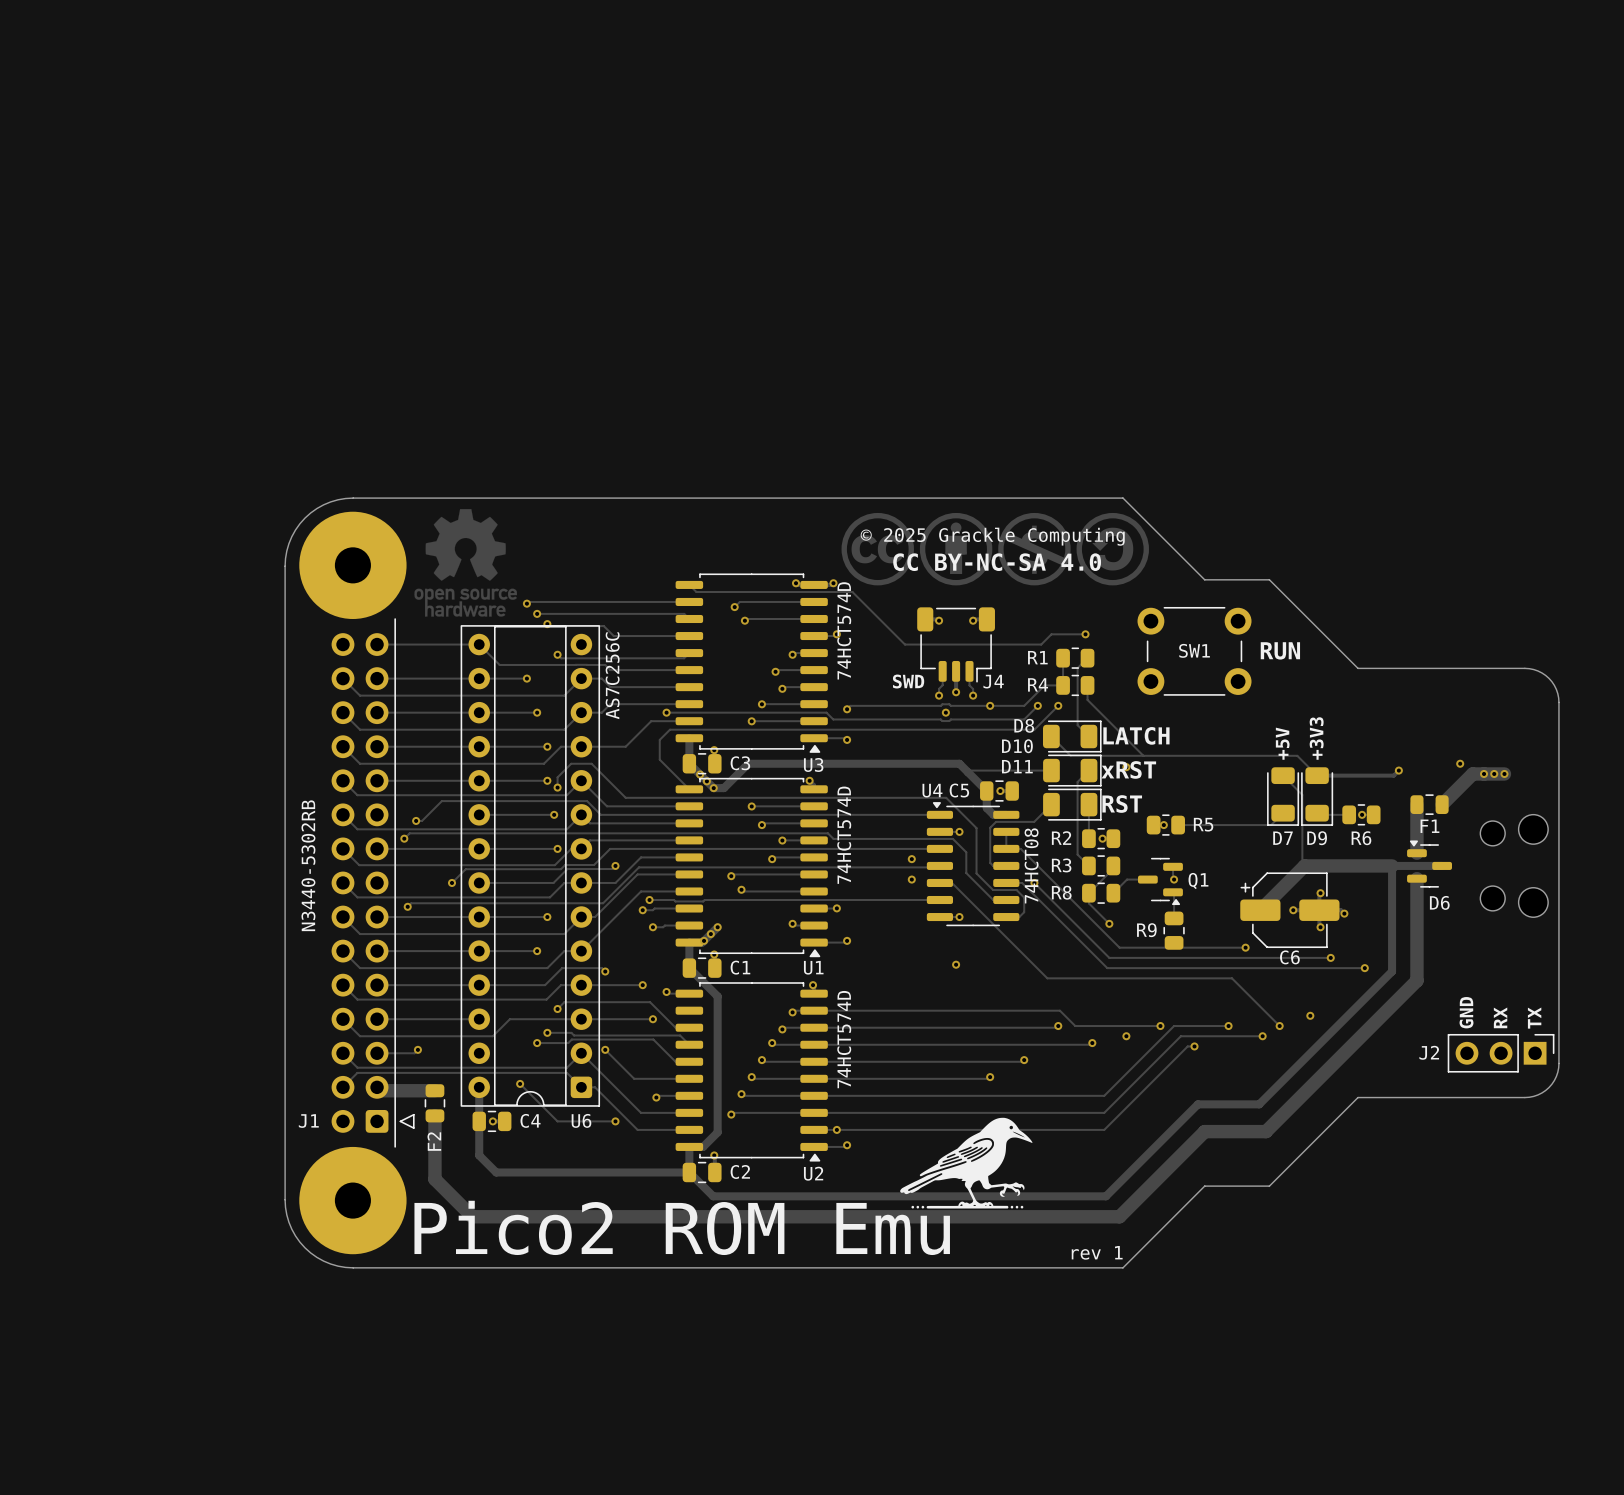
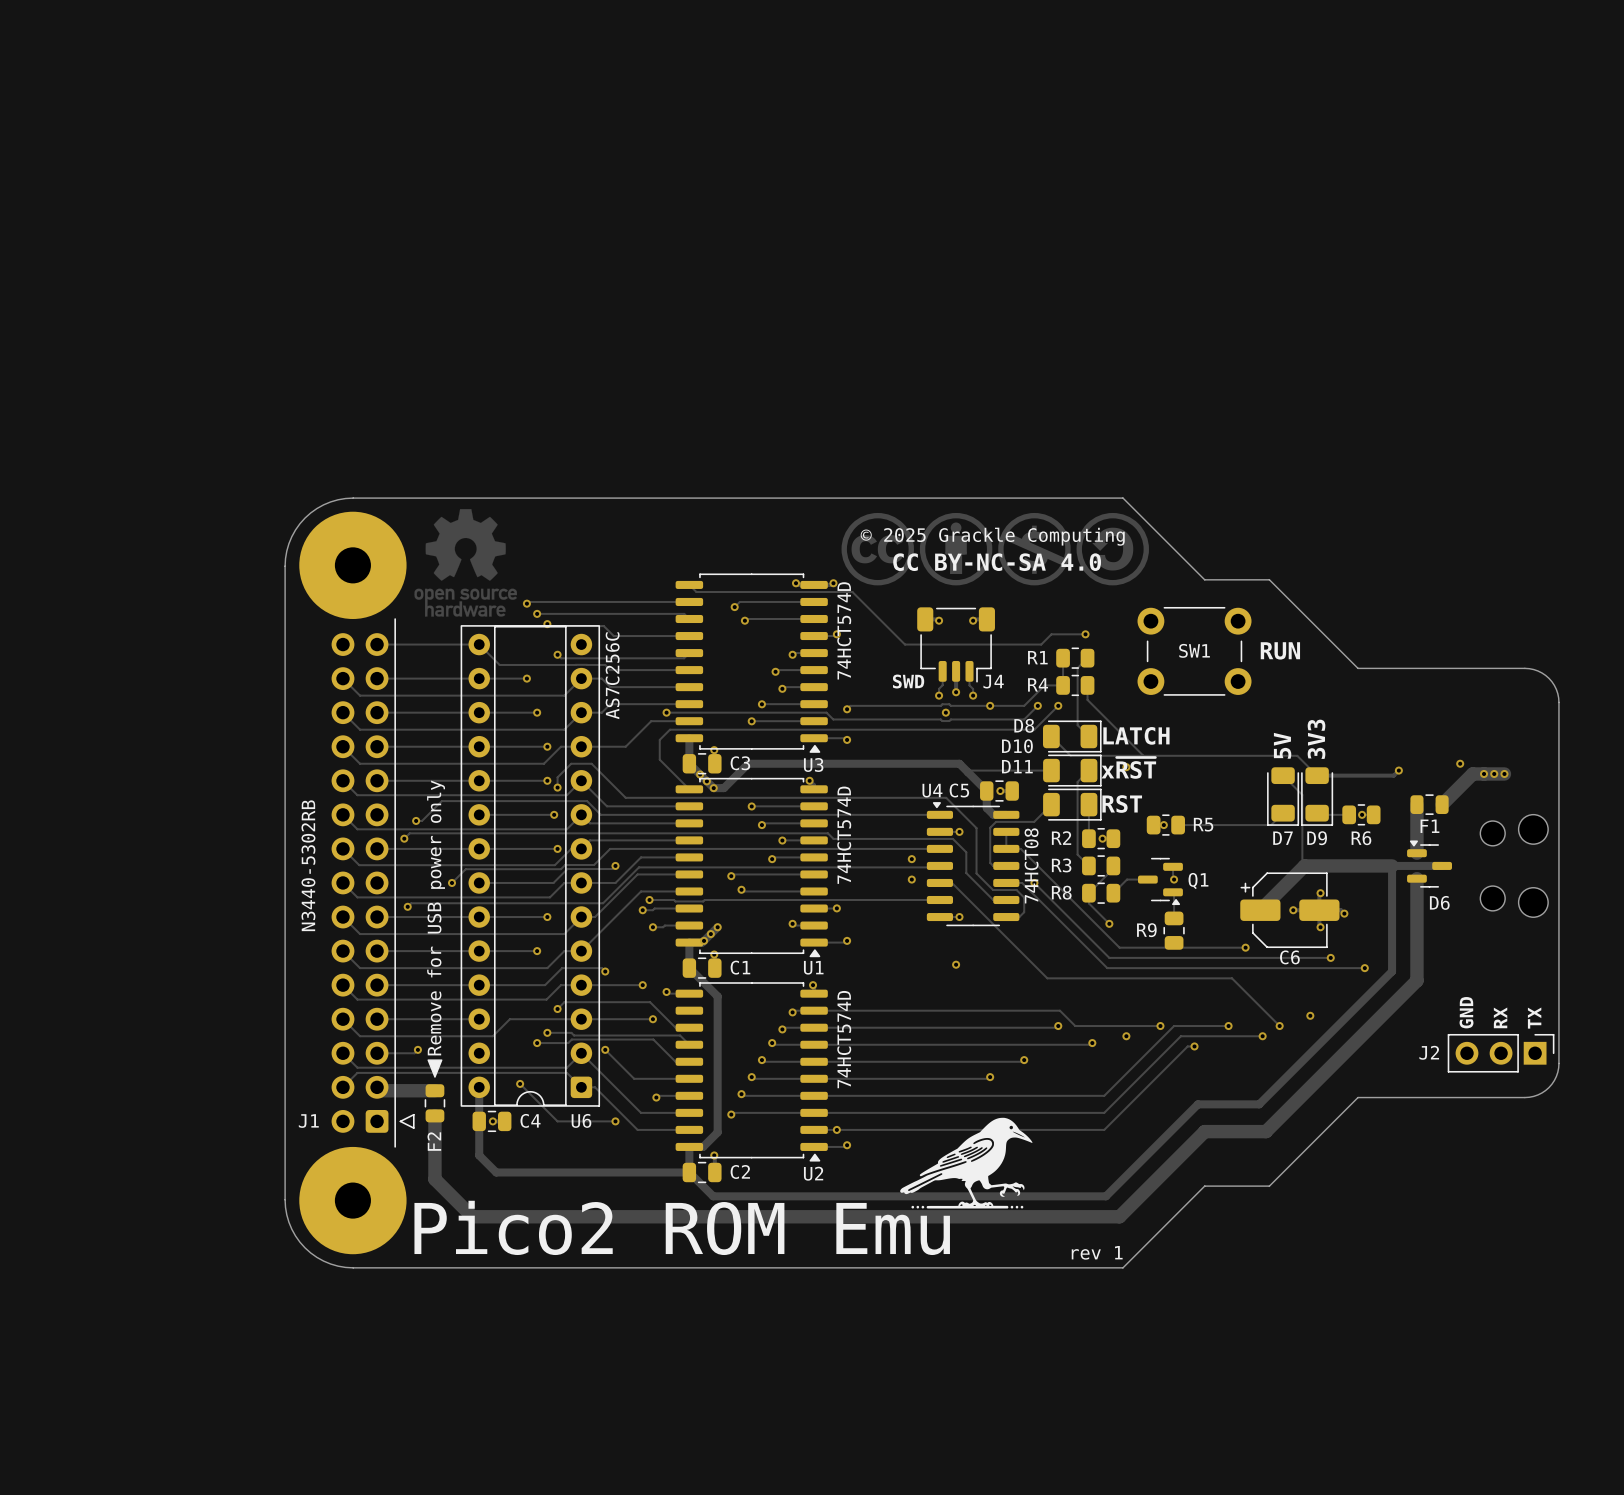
text: +3V3 (1316, 738) -> 3V3 (1316, 739)
text: +5V (1282, 743) -> 5V (1282, 745)
text: xRST (1128, 769) -> x~{RST} (1128, 768)
text: none -> Remove for USB power only (436, 917)
drawing: none -> [427, 1059, 443, 1078]

